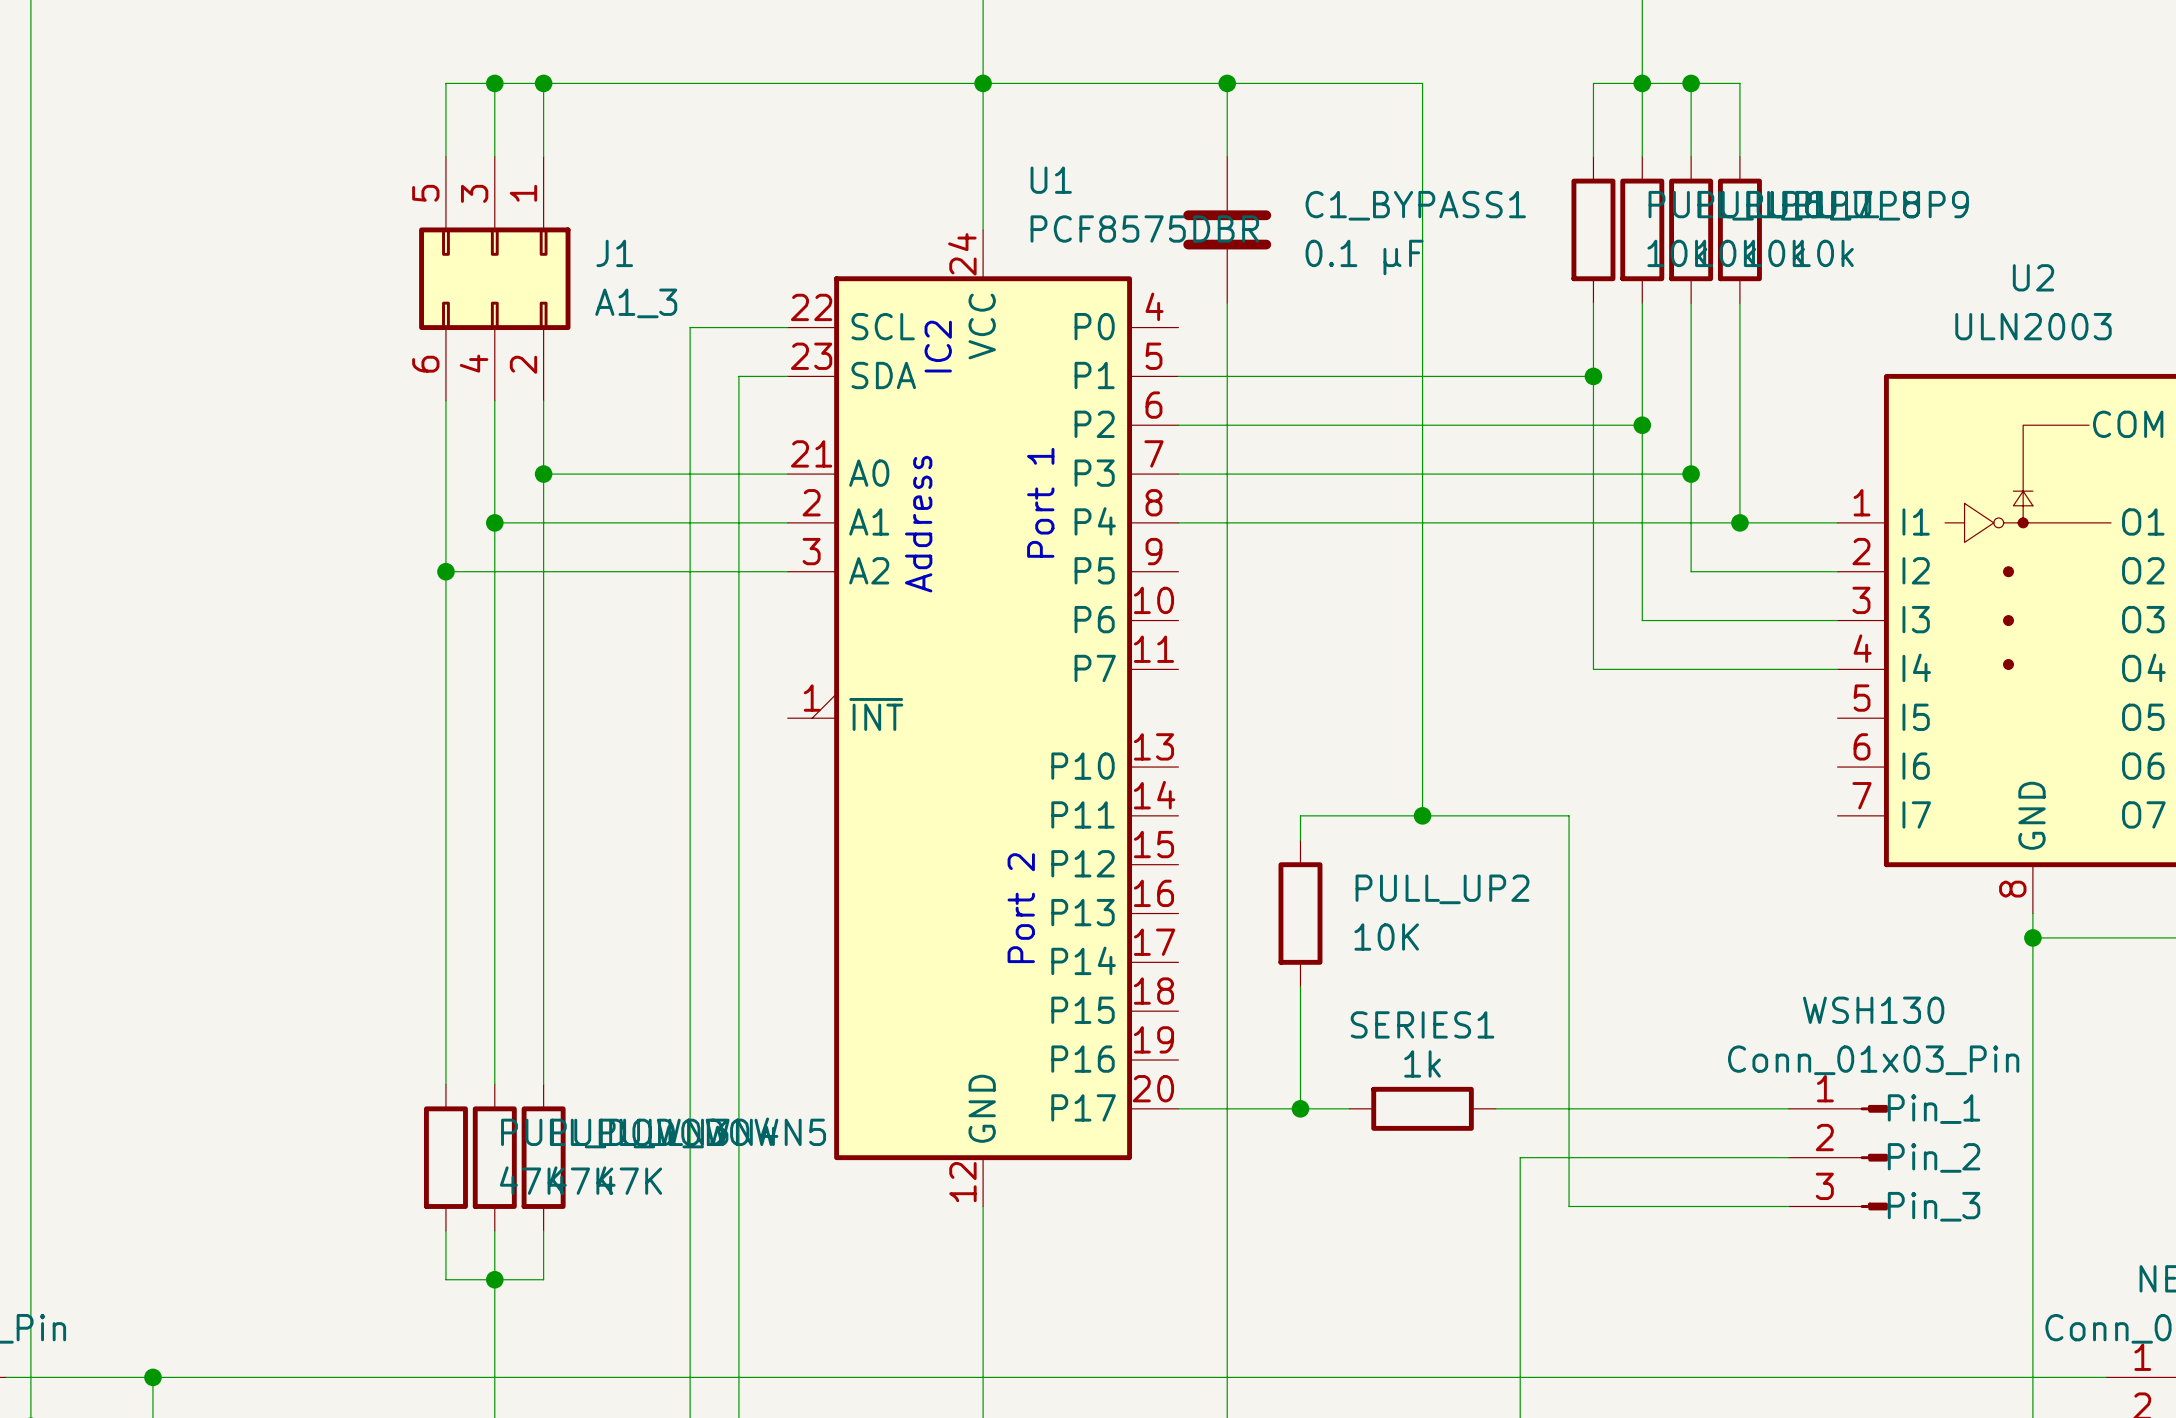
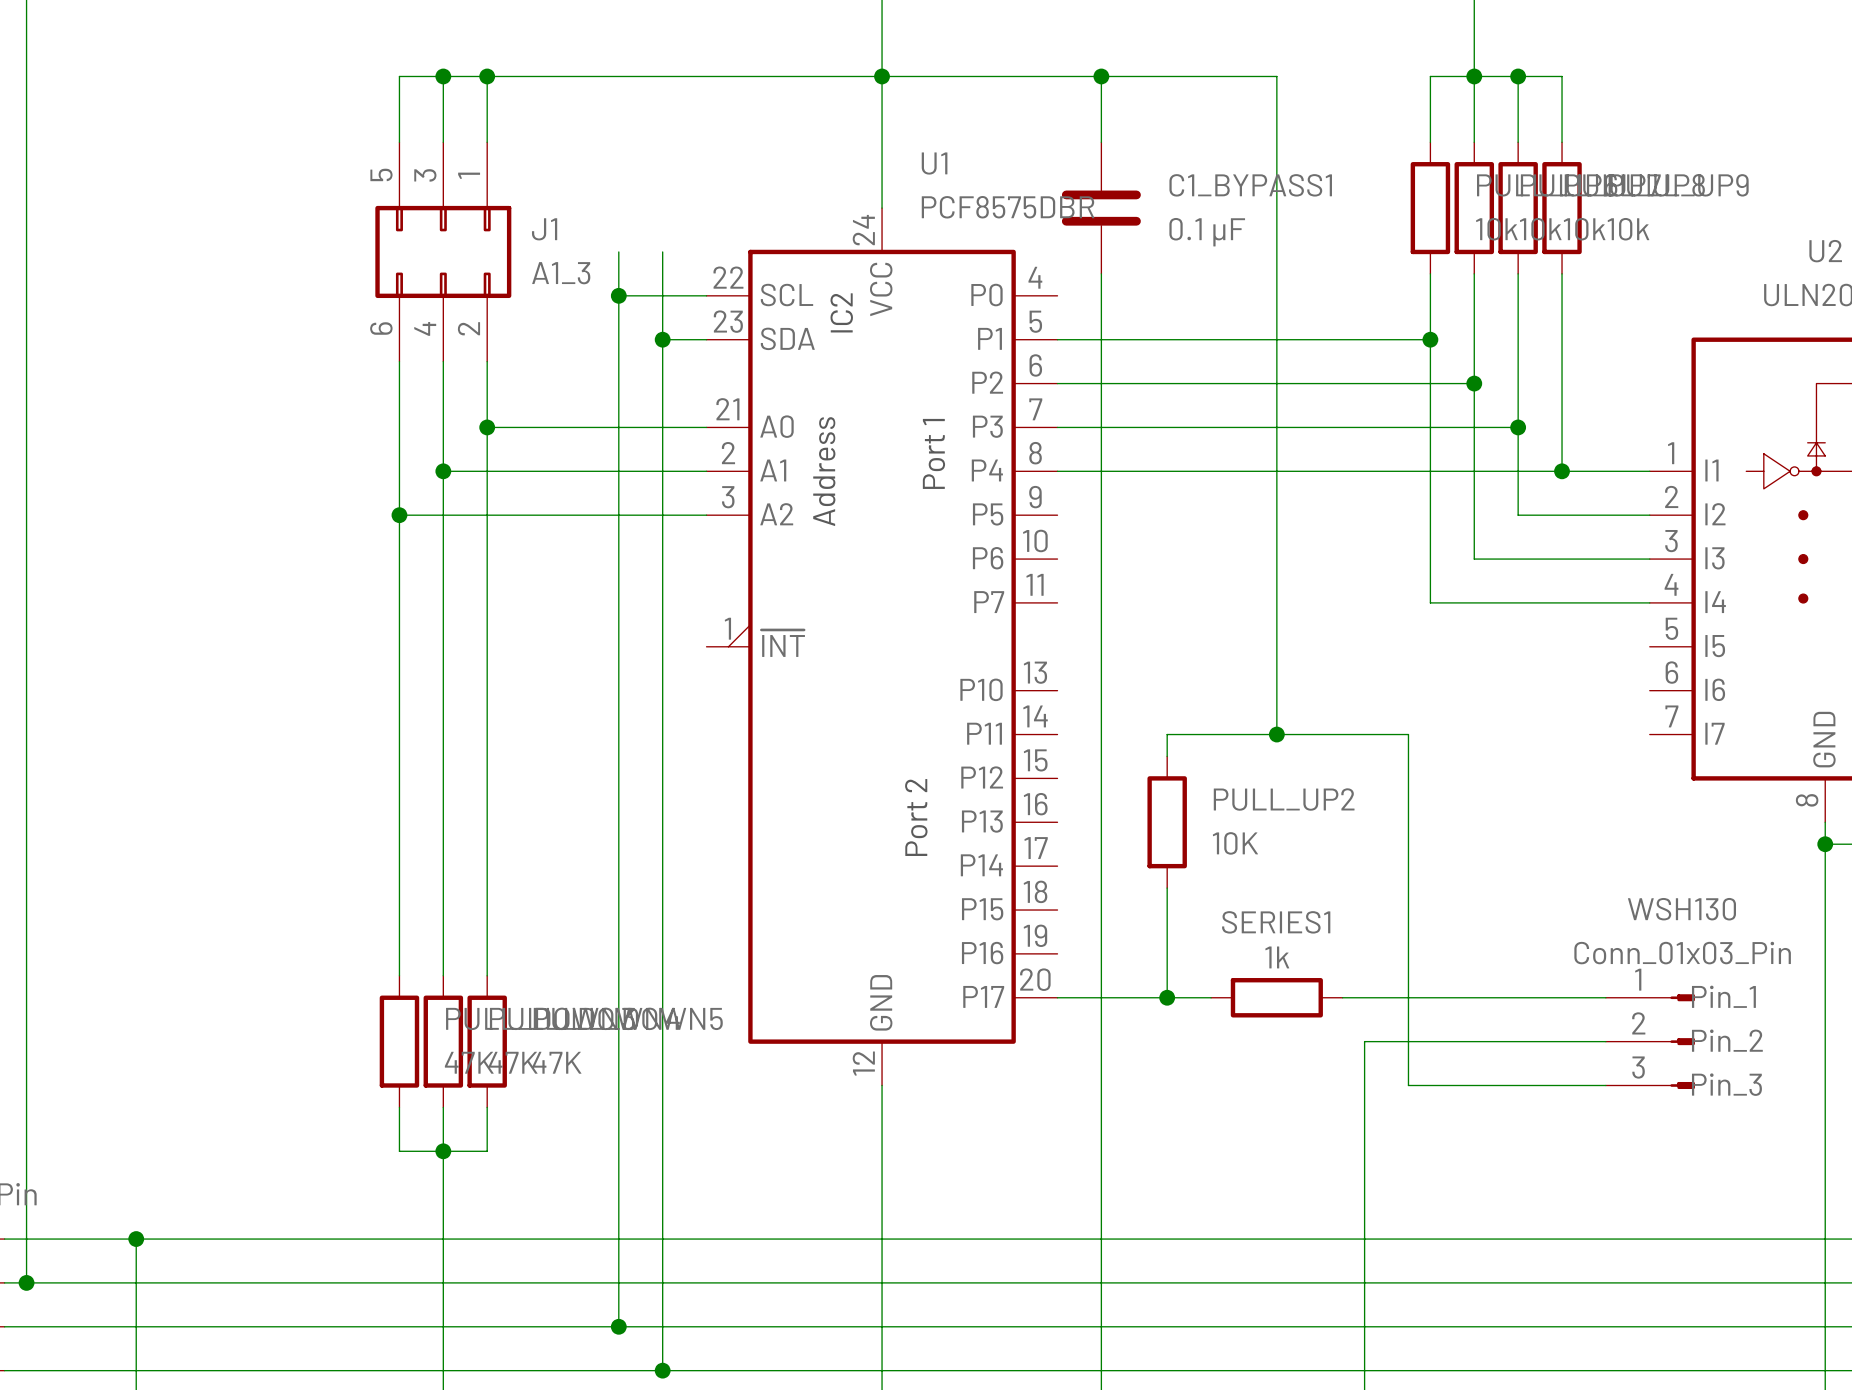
wire: none -> (618, 251) (618, 295)
wire: none -> (662, 251) (662, 339)
junction: none -> (618, 295)
junction: none -> (662, 339)

